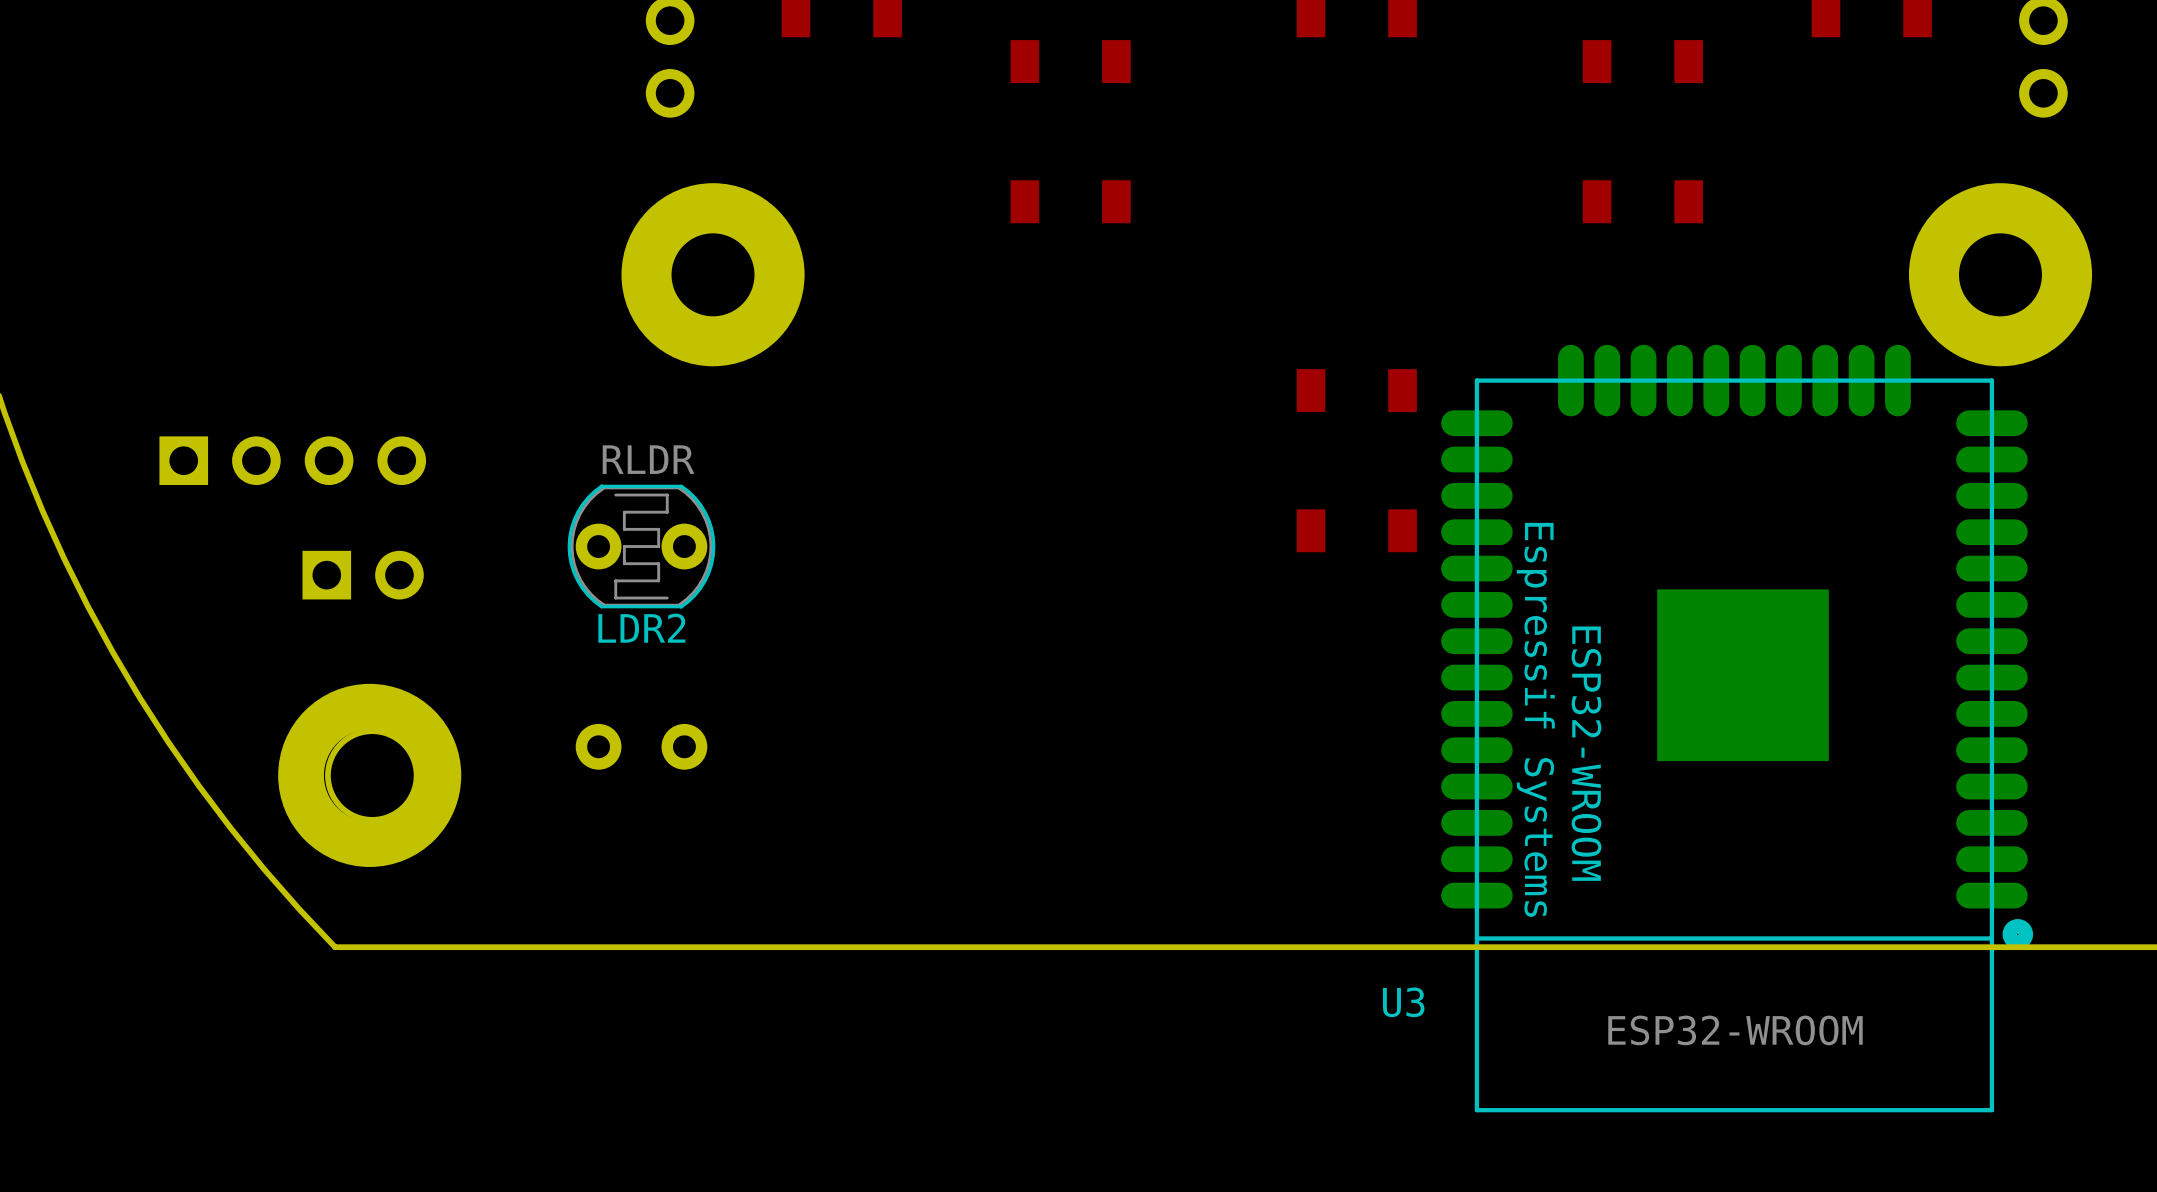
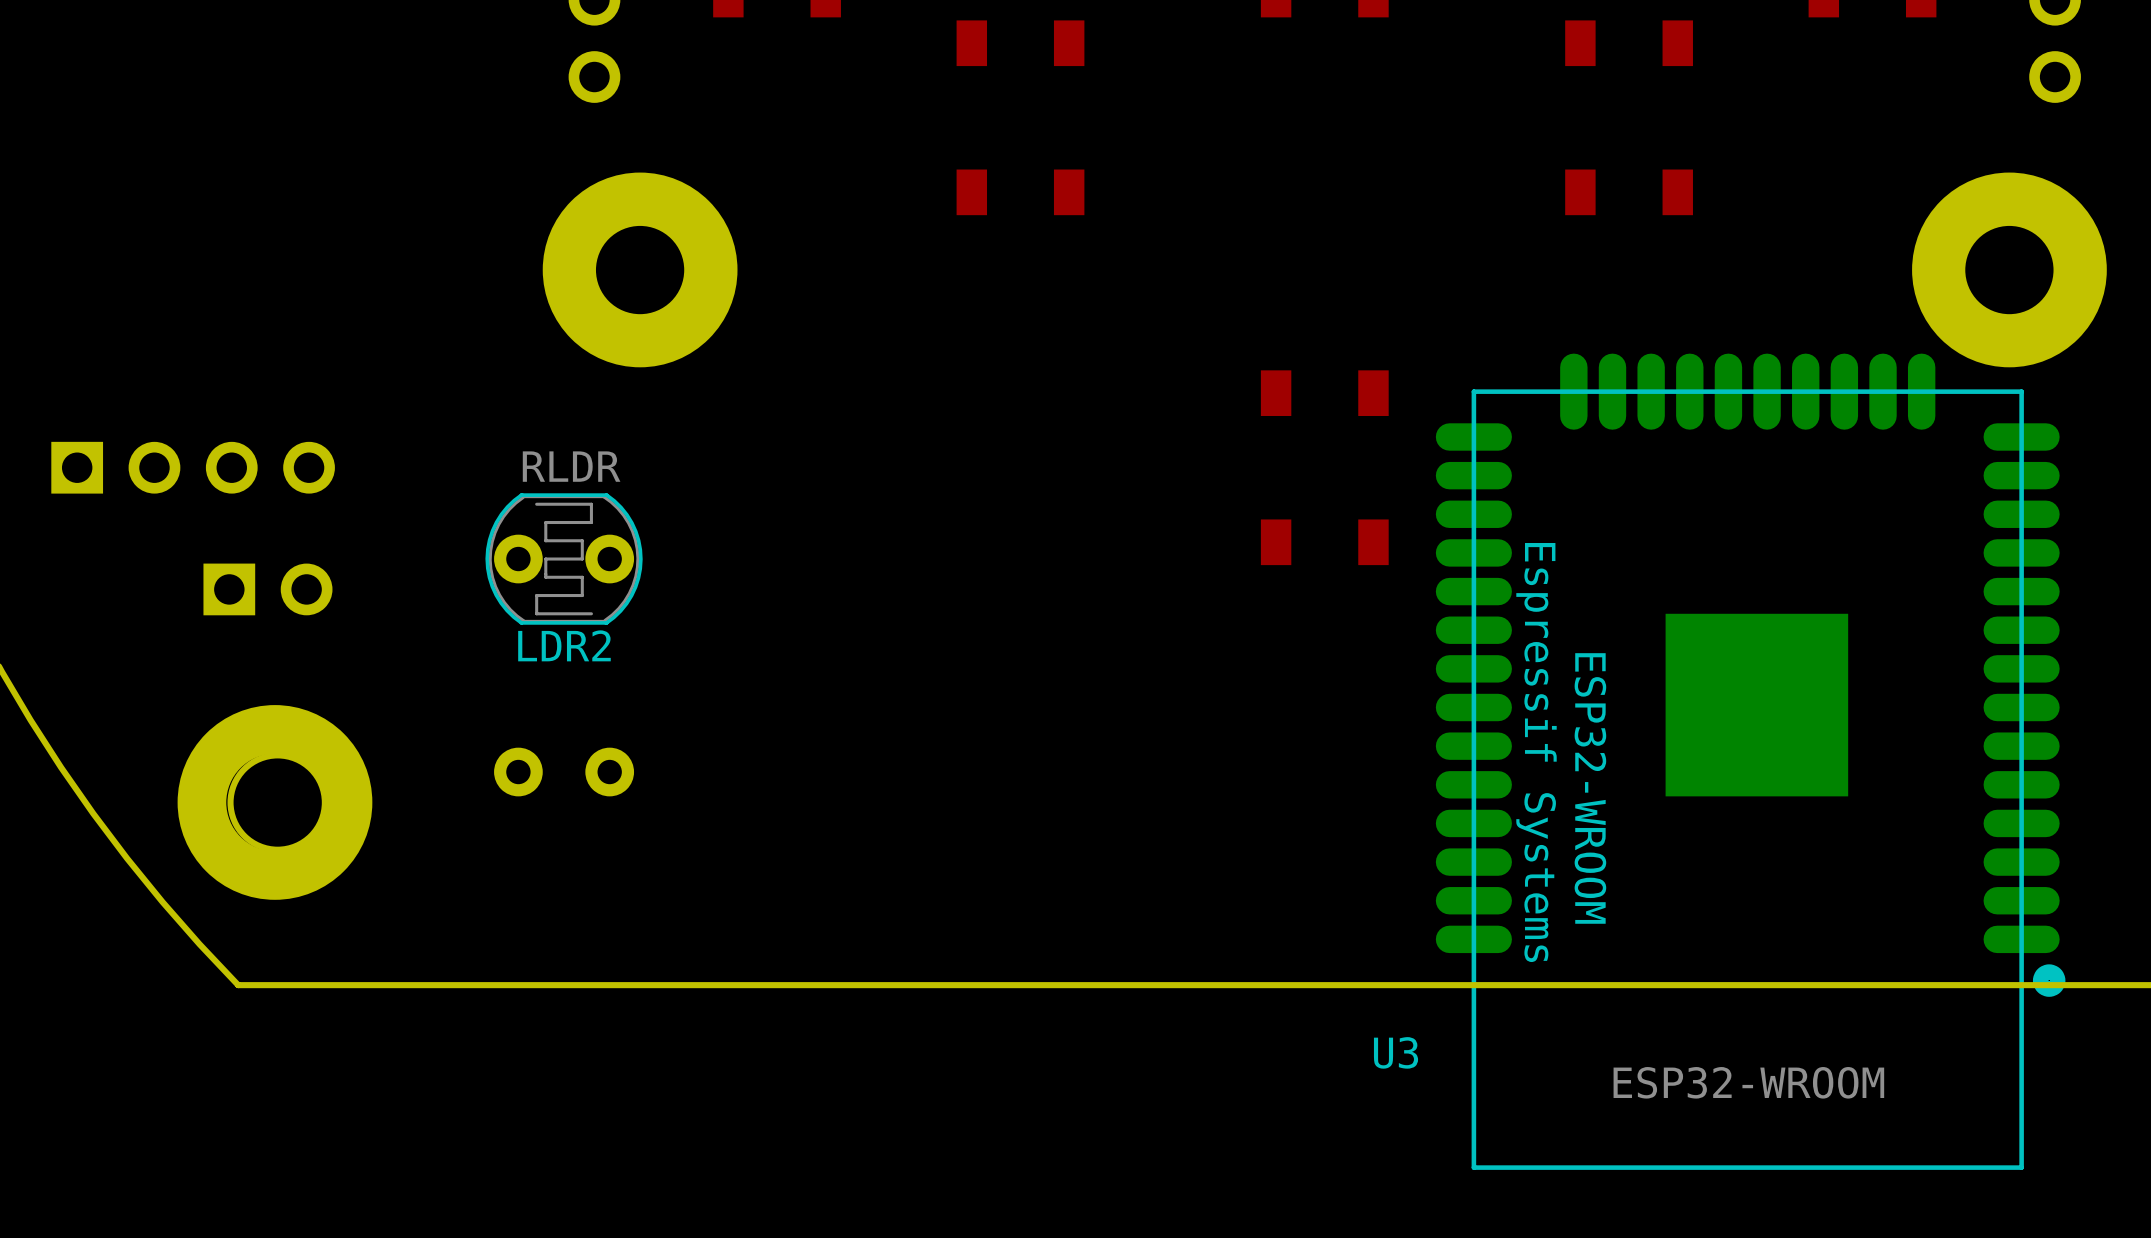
U3 position: (1737, 728) -> (1750, 761)

